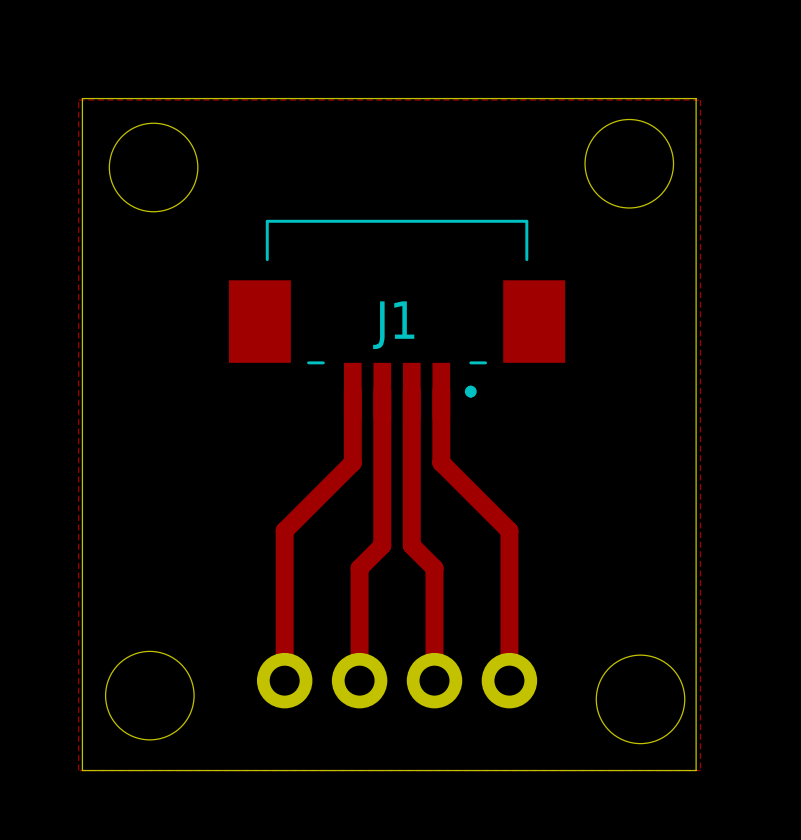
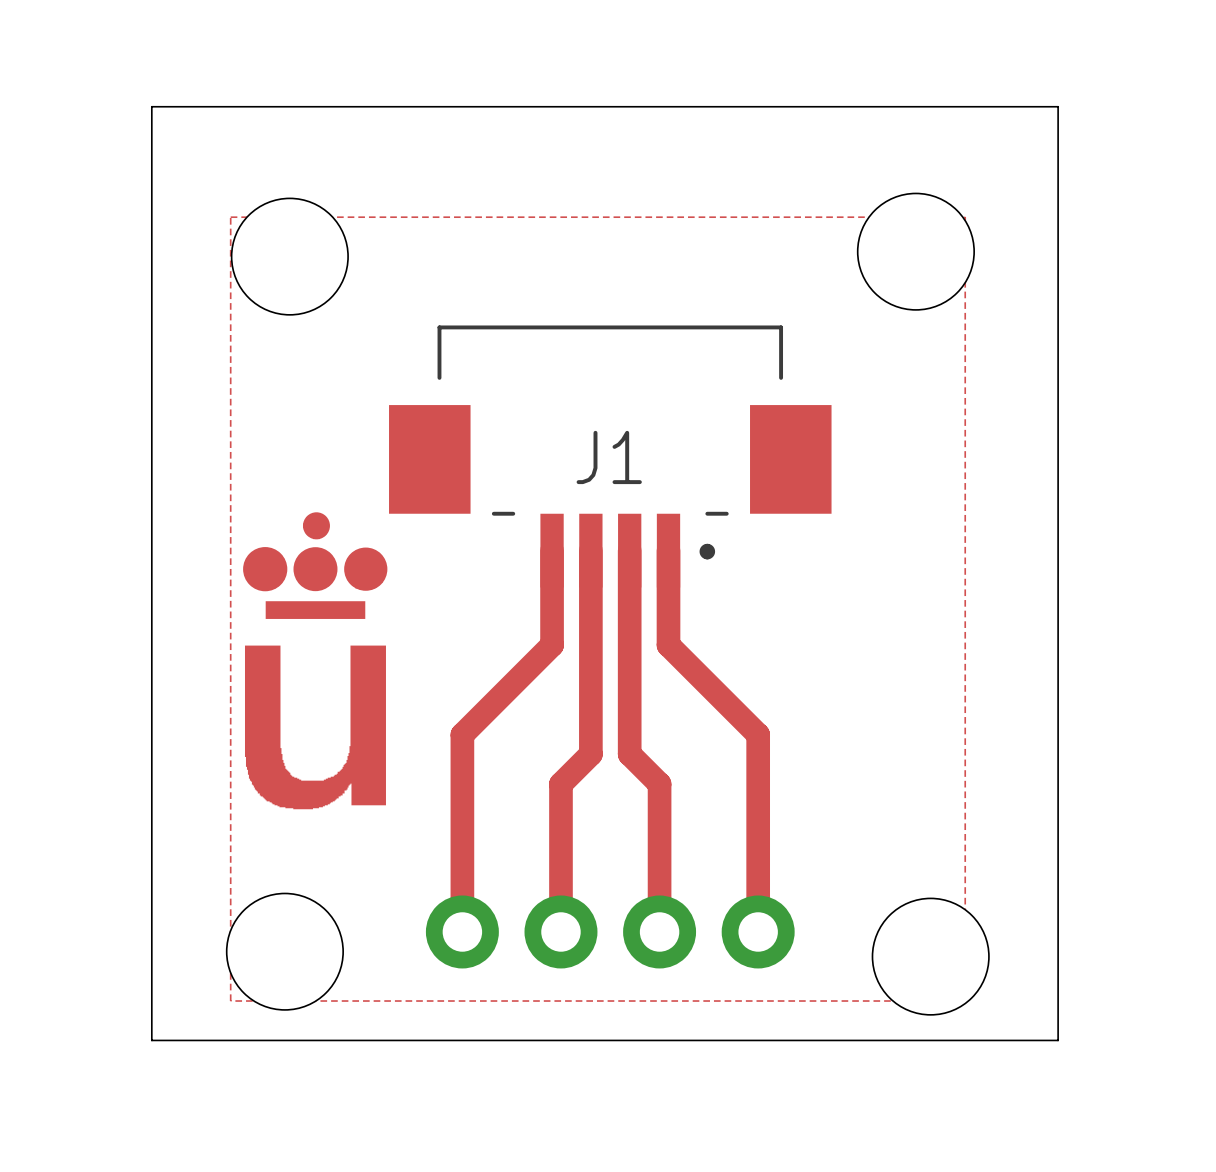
board edge: (82, 98) (696, 98) (696, 770) (82, 770) (82, 98) -> (151, 106) (151, 1040) (1058, 1040) (1058, 106) (151, 106)
zone outline: (78, 100) (700, 100) (700, 770) (78, 770) (78, 100) -> (230, 217) (230, 1001) (965, 1001) (965, 217) (230, 217)
drawing: none -> [243, 512, 388, 810]

